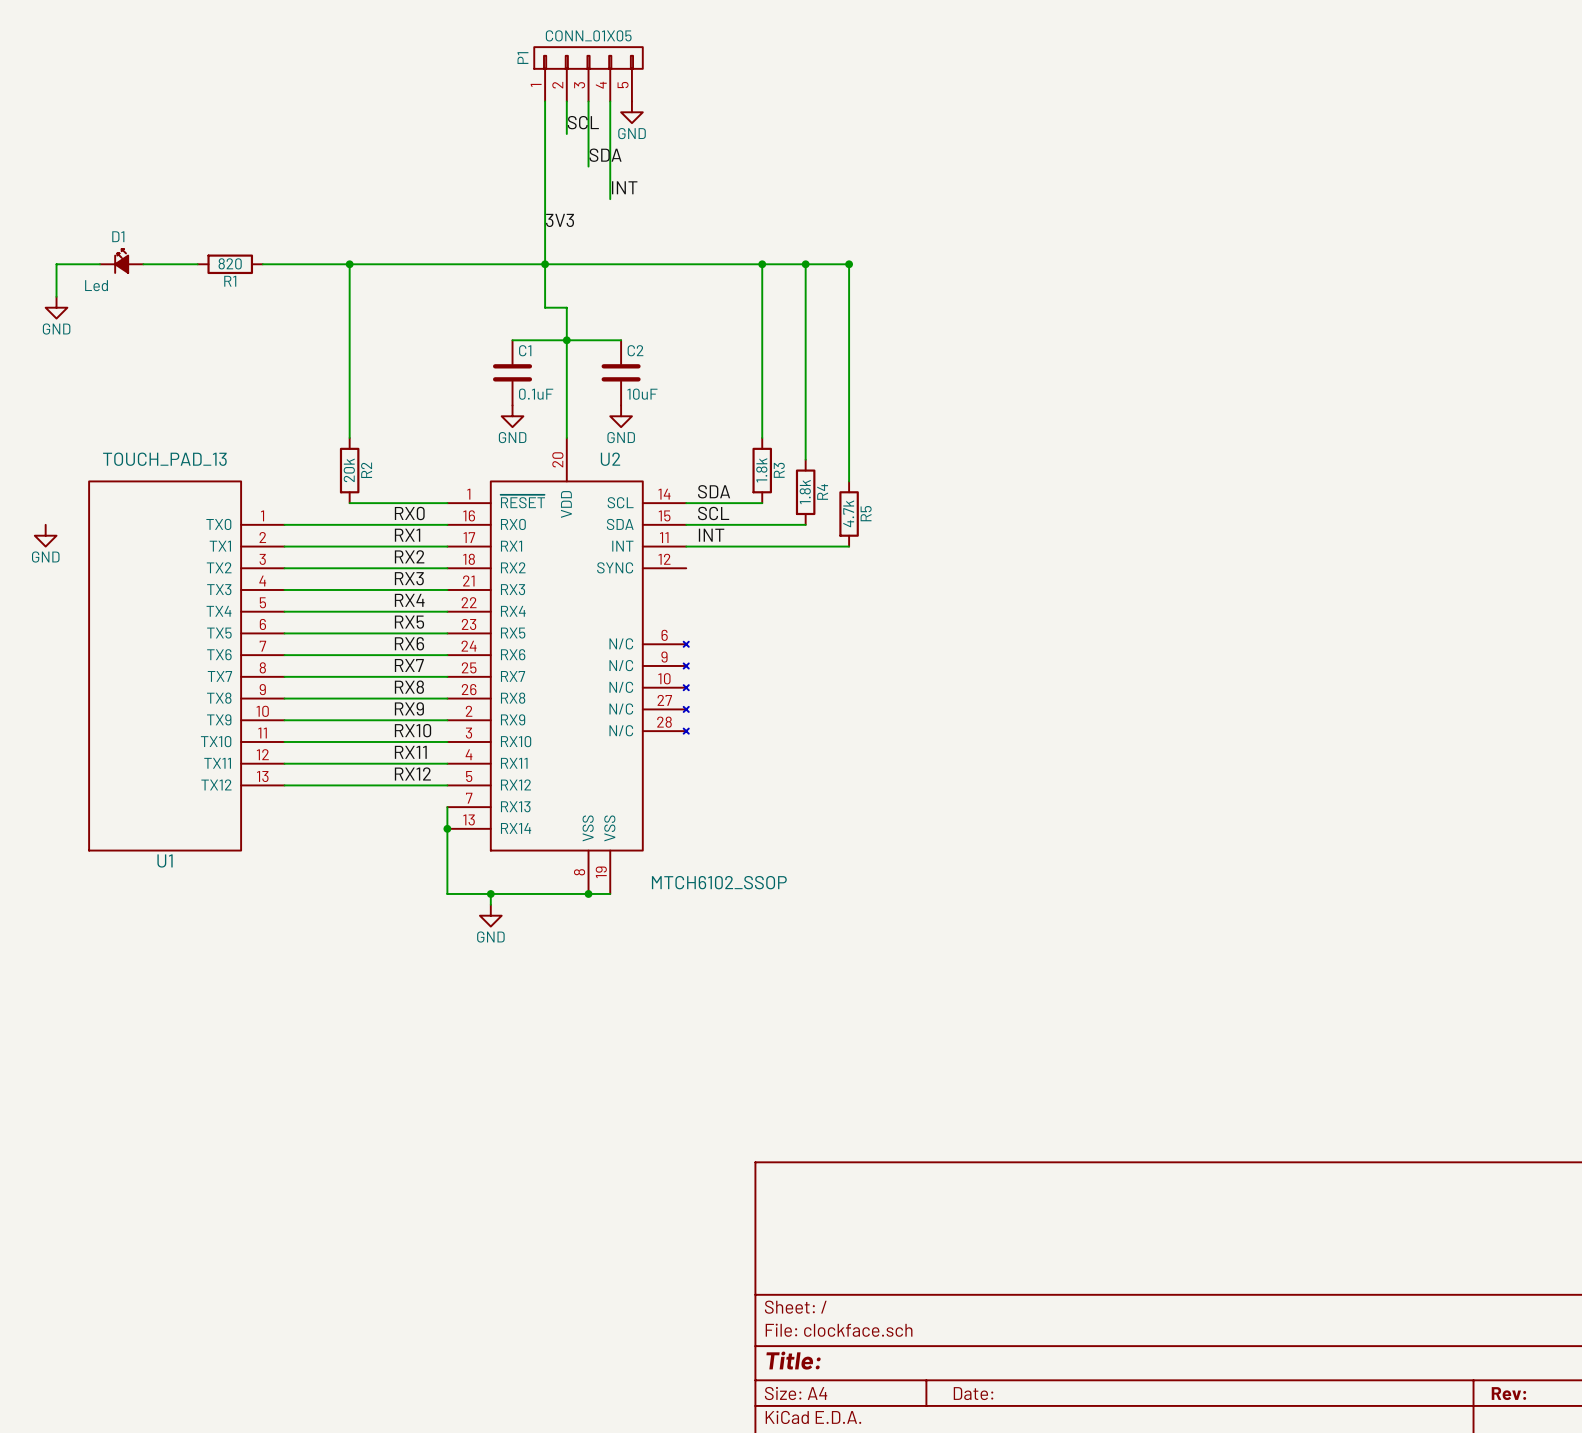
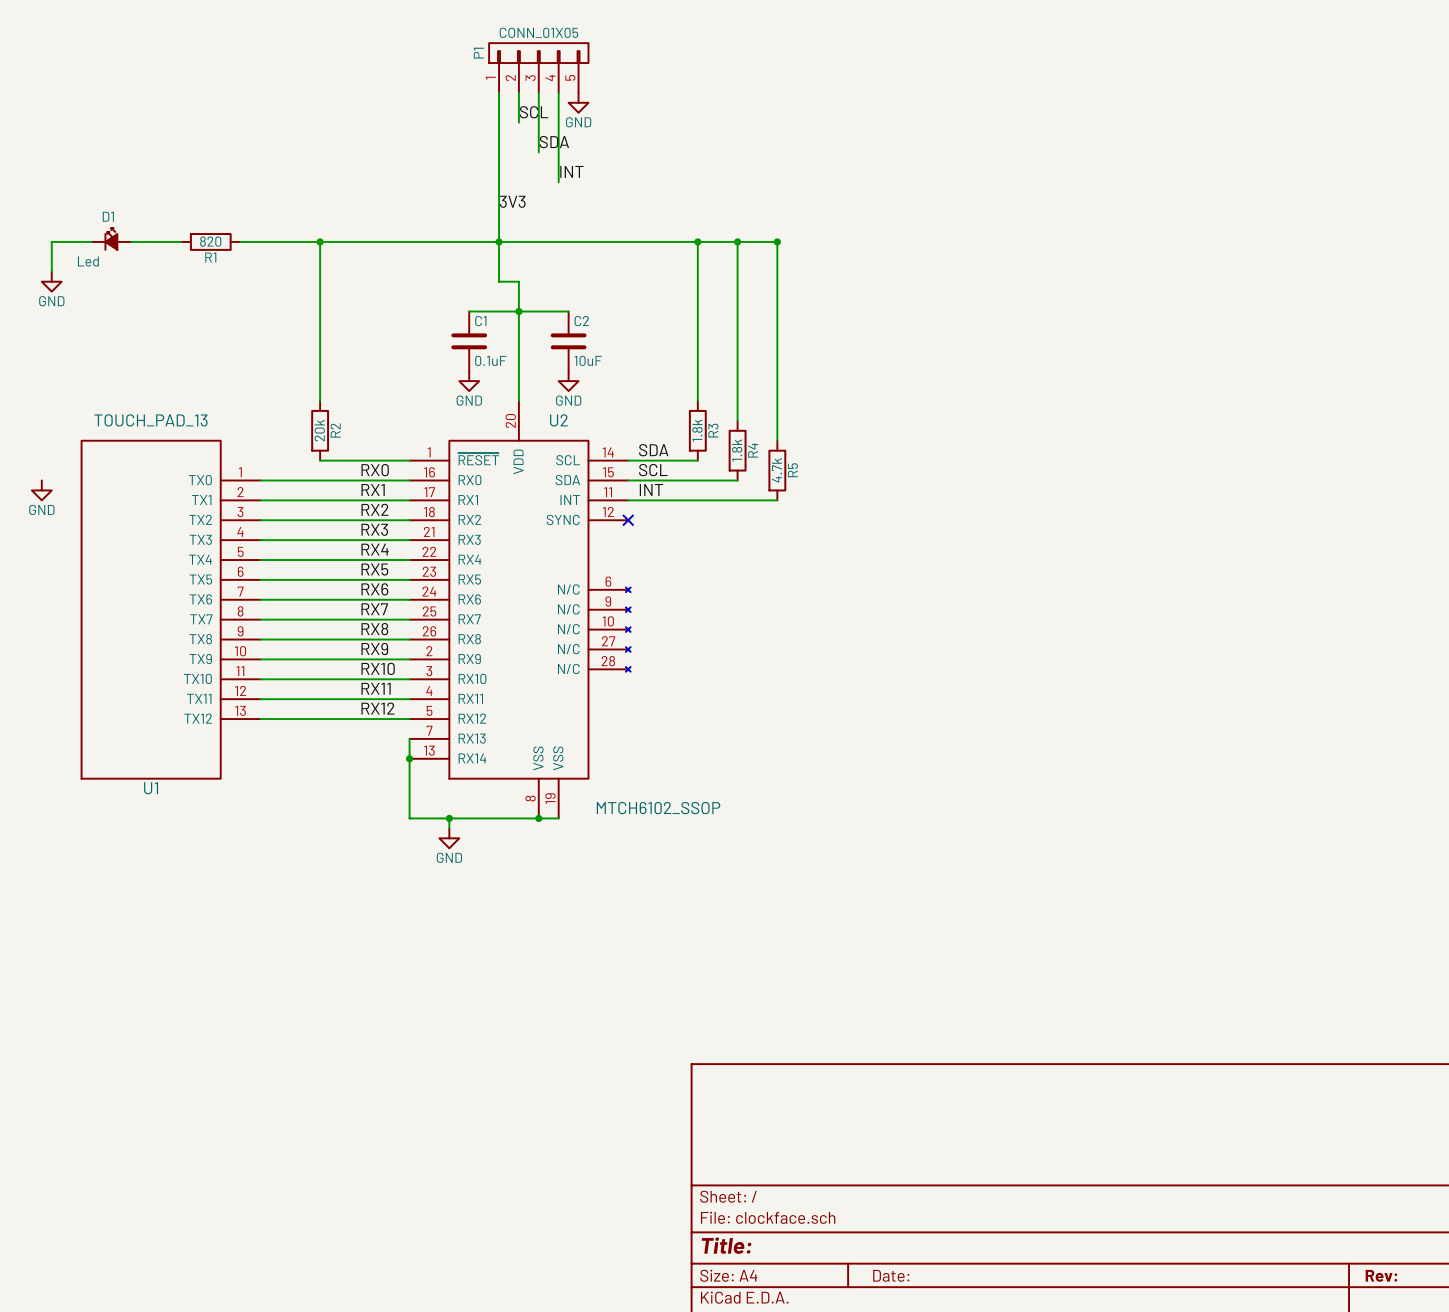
no-connect mark: none -> (628, 520)

